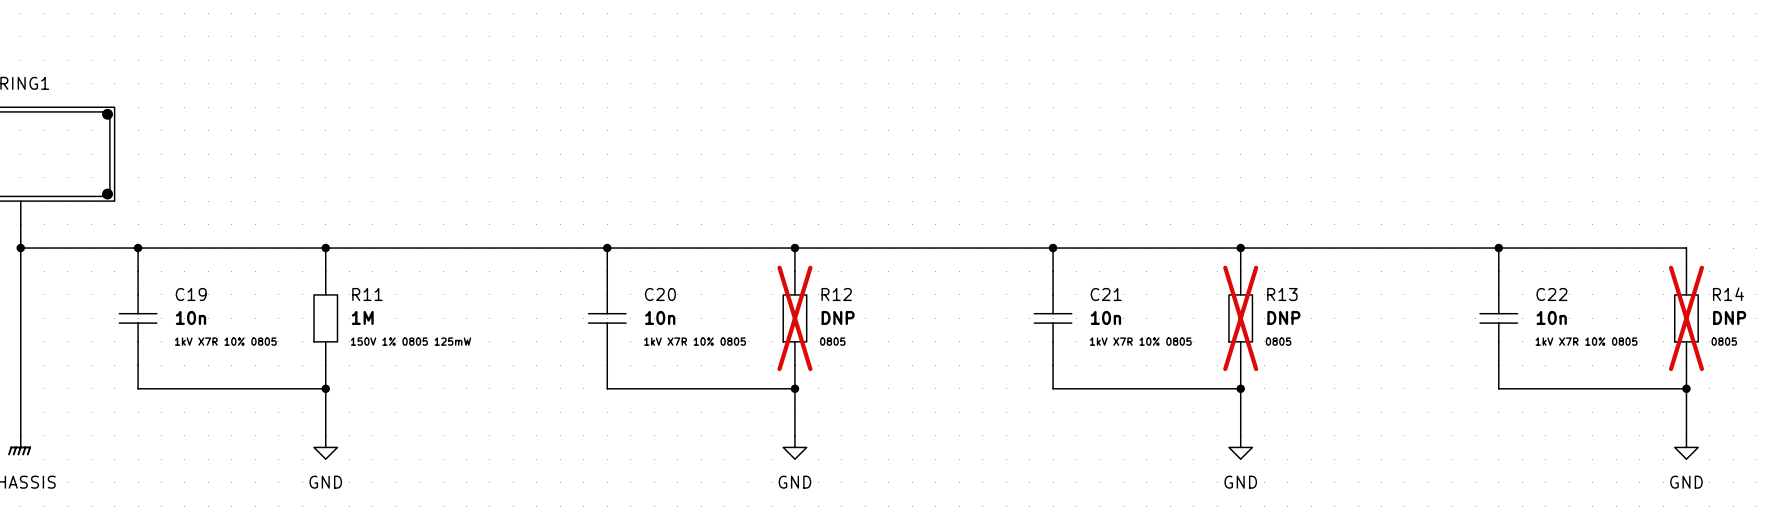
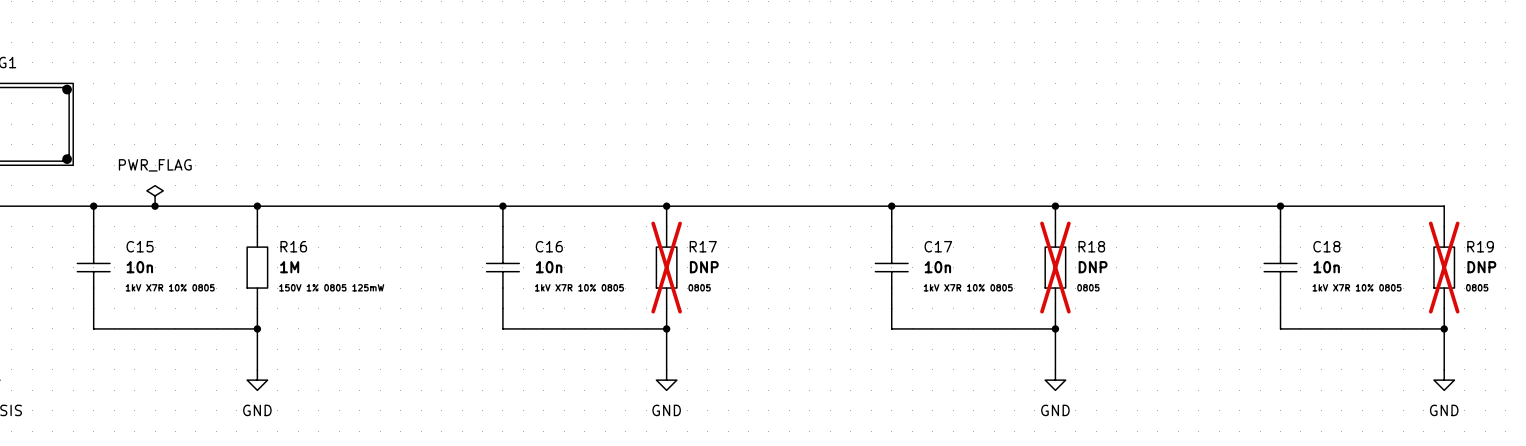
power symbol: none -> PWR_FLAG (155, 195)
junction: none -> (155, 206)
C19 name: C19 (191, 294) -> C15 (140, 246)
R11 name: R11 (367, 294) -> R16 (293, 246)
C20 name: C20 (660, 294) -> C16 (549, 246)
R12 name: R12 (836, 294) -> R17 (703, 246)
C21 name: C21 (1106, 294) -> C17 (938, 246)
R13 name: R13 (1282, 294) -> R18 (1091, 246)
C22 name: C22 (1551, 294) -> C18 (1326, 246)
R14 name: R14 (1728, 294) -> R19 (1480, 246)

